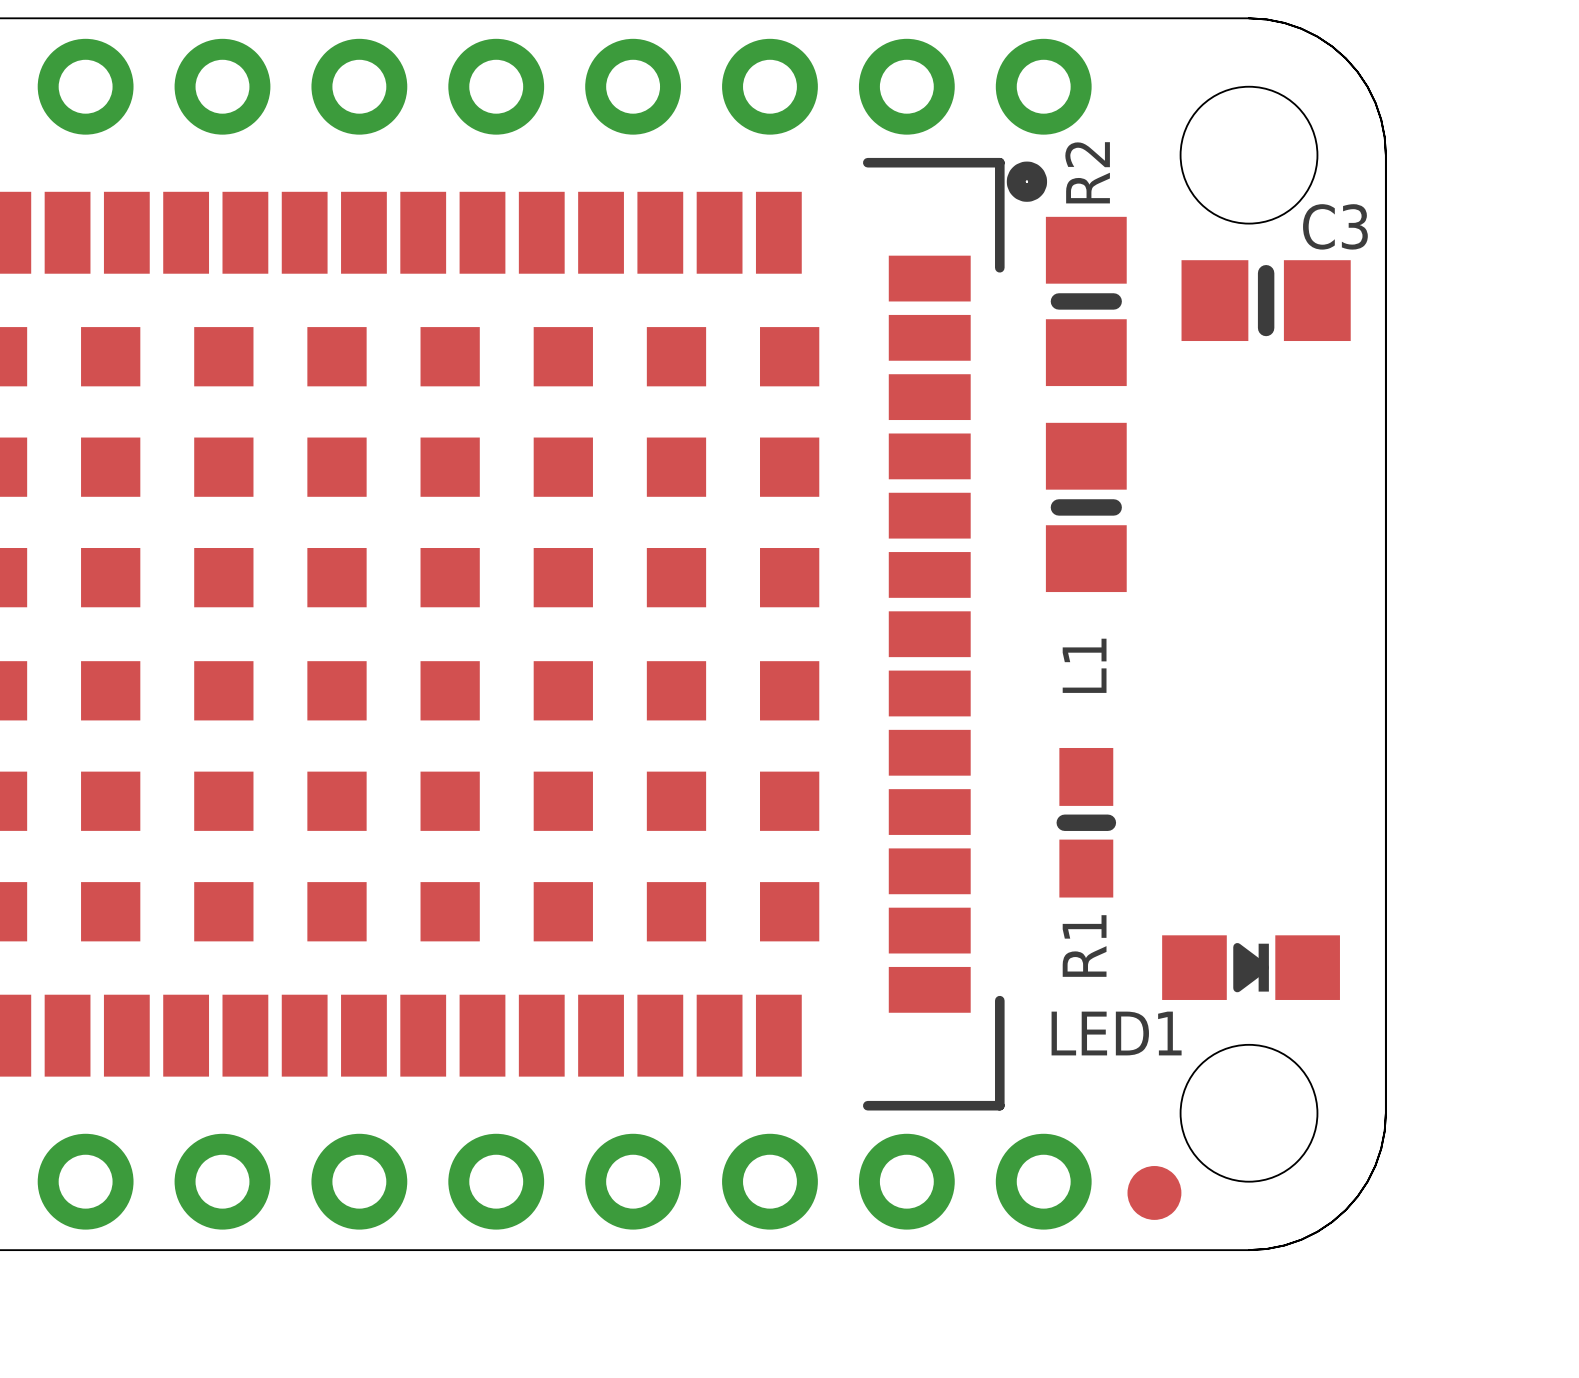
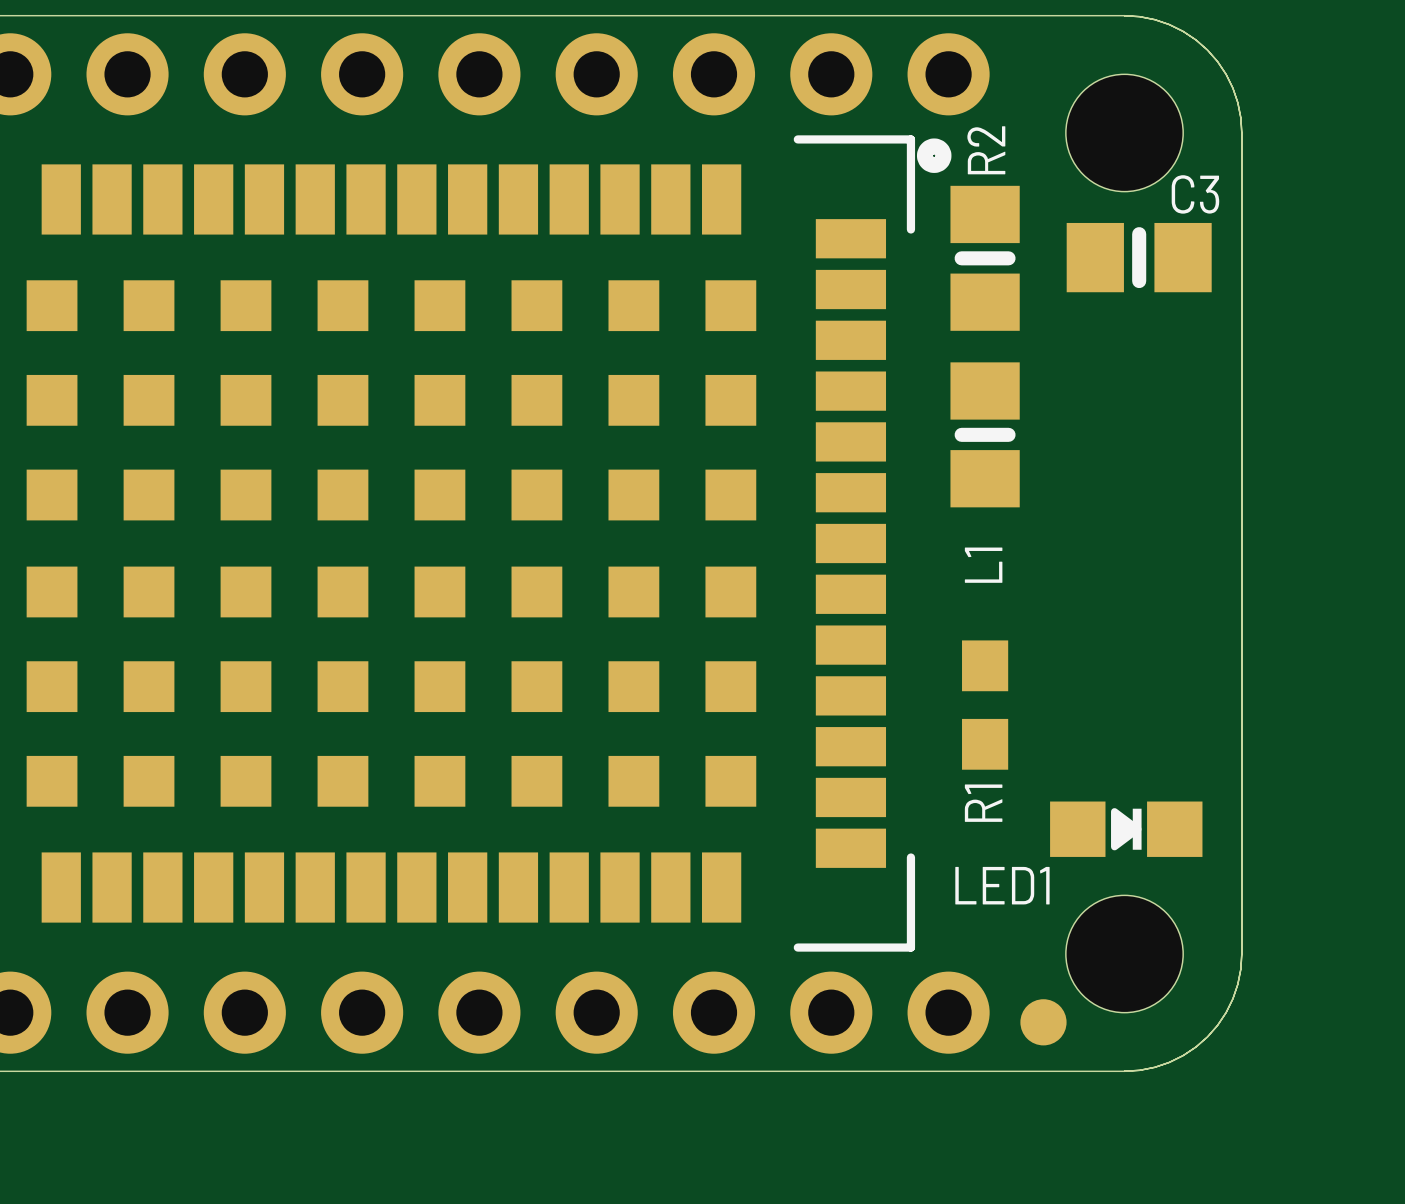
R1 footprint: [1056, 747, 1117, 898] -> [962, 640, 1009, 770]

